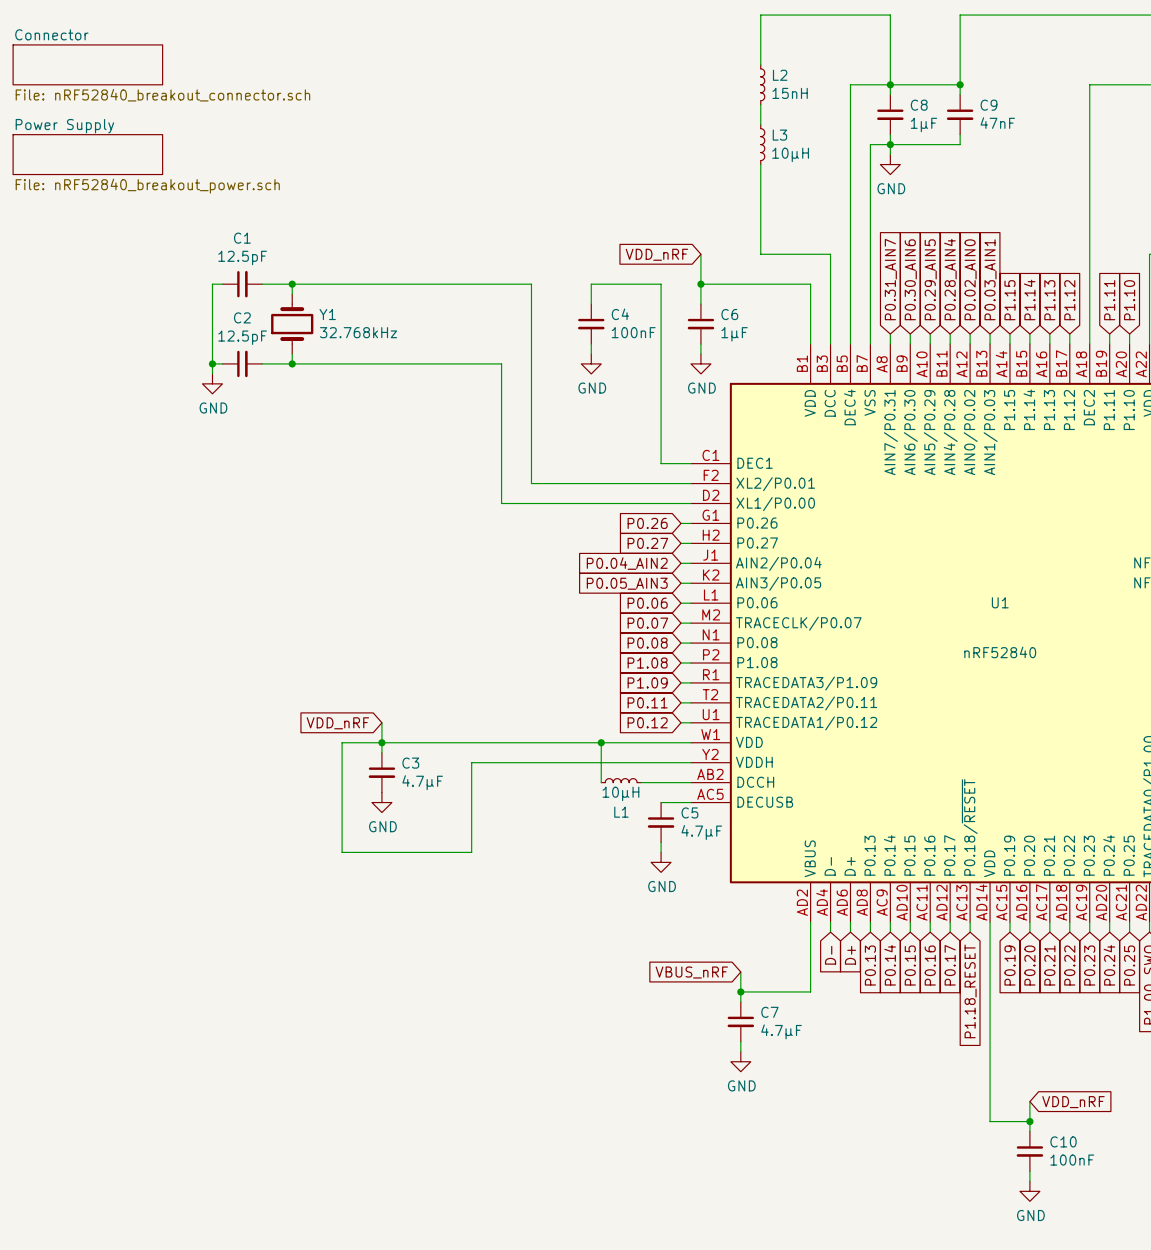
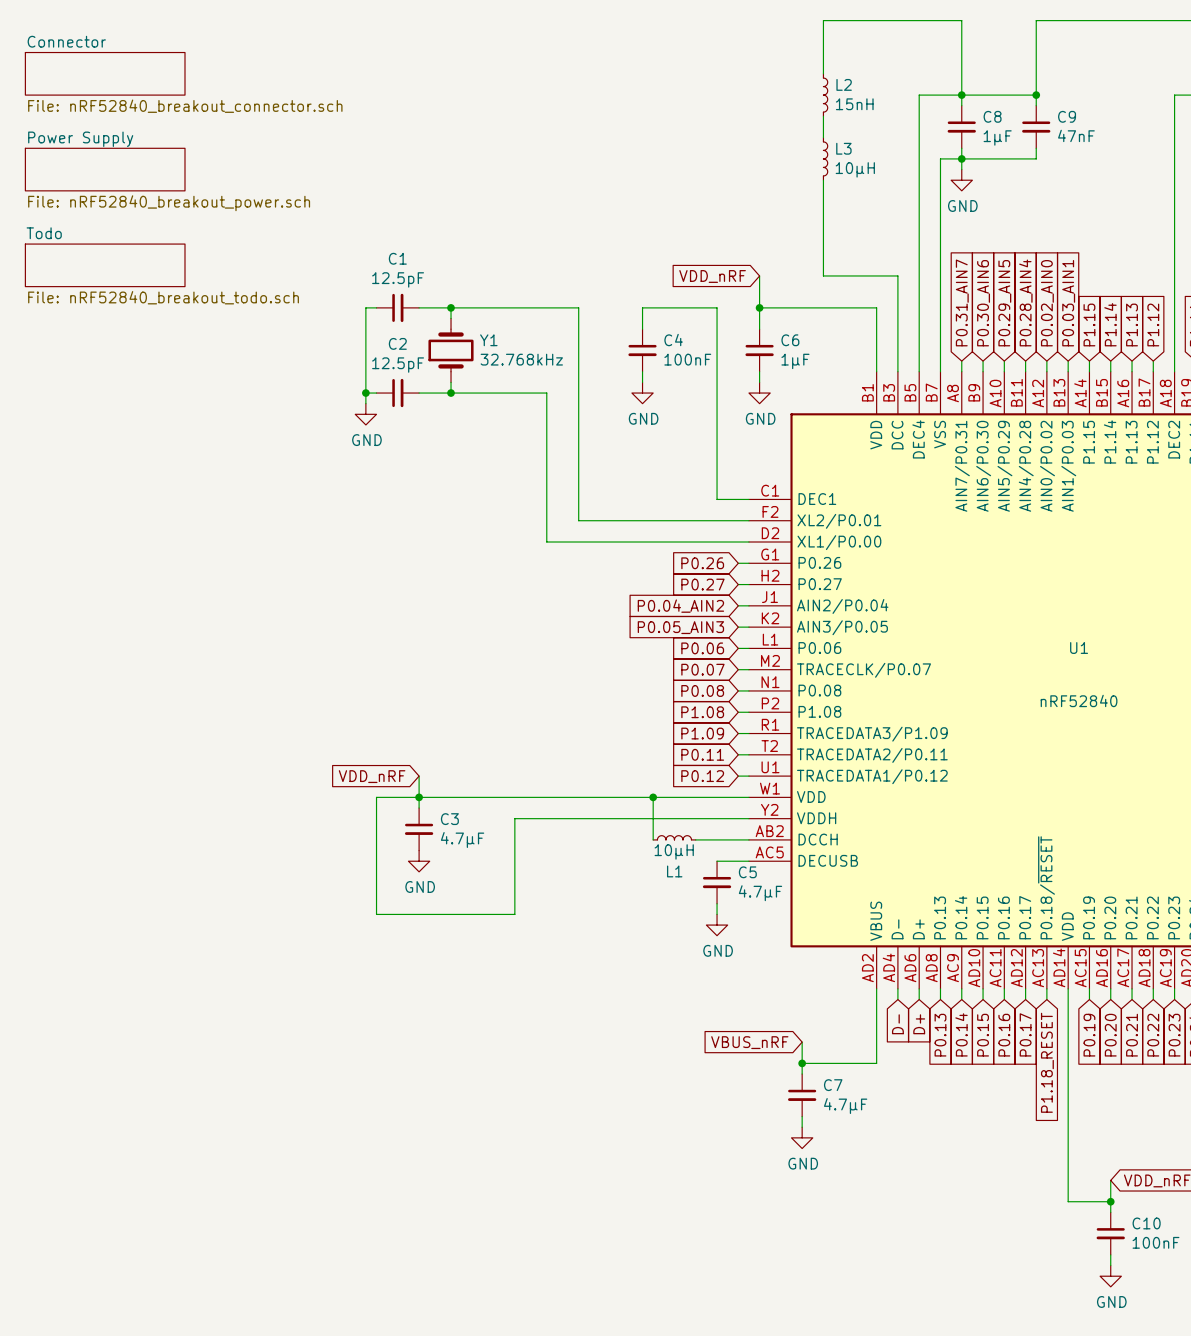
sheet Todo: none -> File: nRF52840_breakout_todo.sch (105, 265)
wire: (222, 284) (212, 284) (212, 373) -> none
C1 position: (242, 284) -> (397, 307)
wire: (262, 284) (332, 284) -> (365, 403) (365, 307)
wire: (292, 284) (292, 294) -> (451, 307) (451, 318)
junction: (292, 284) -> none
junction: none -> (451, 307)
Y1 position: (292, 324) -> (451, 350)
wire: (292, 353) (292, 363) -> (451, 382) (451, 393)
wire: (212, 363) (222, 363) -> none
junction: (212, 363) -> none
C2 position: (242, 363) -> (397, 393)
wire: (262, 363) (332, 363) -> none
junction position: (292, 363) -> (365, 393)
junction: none -> (451, 393)
power symbol position: GND (212, 383) -> GND (365, 414)

